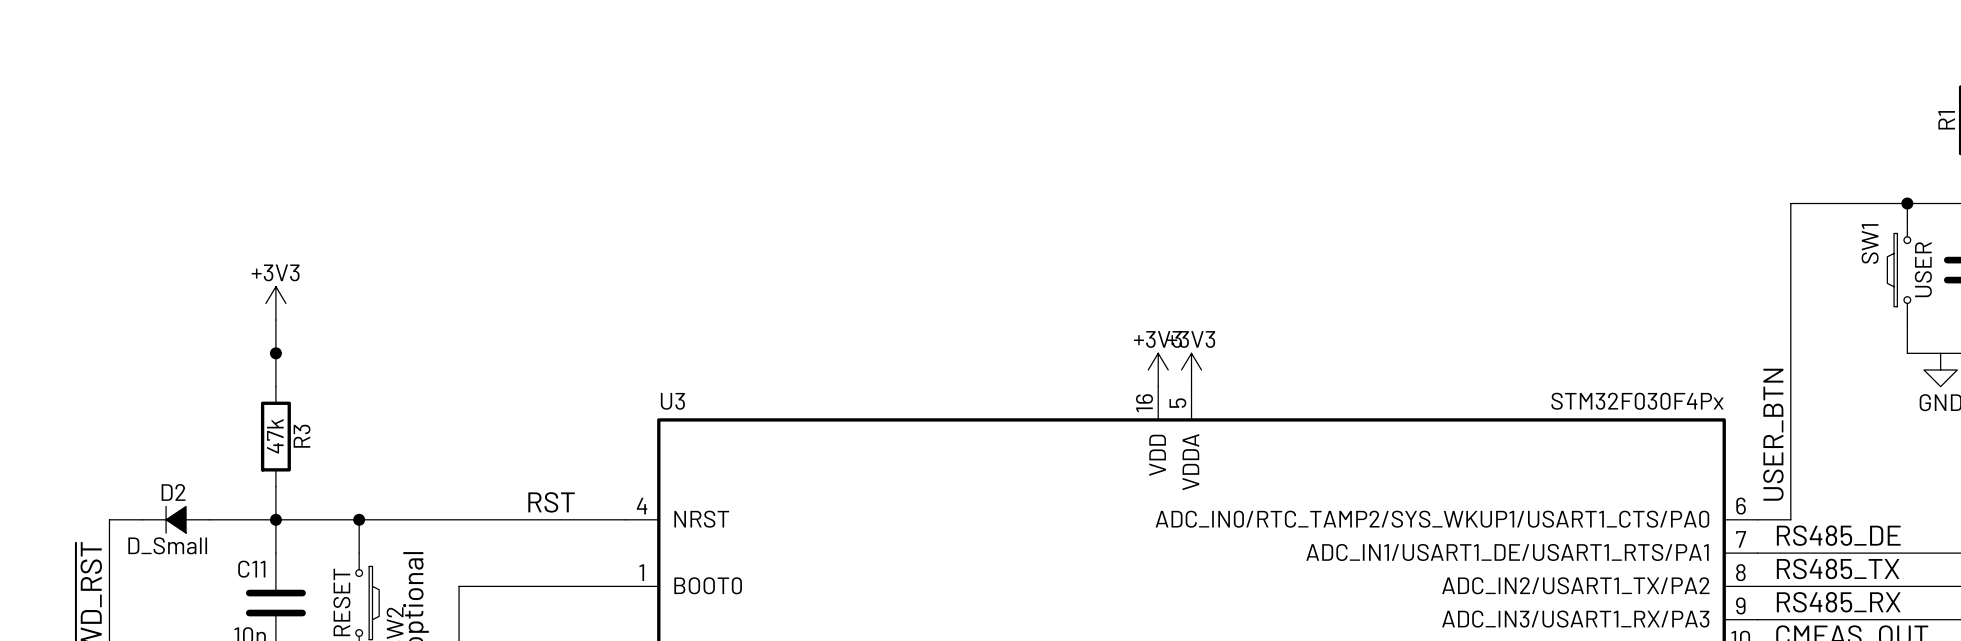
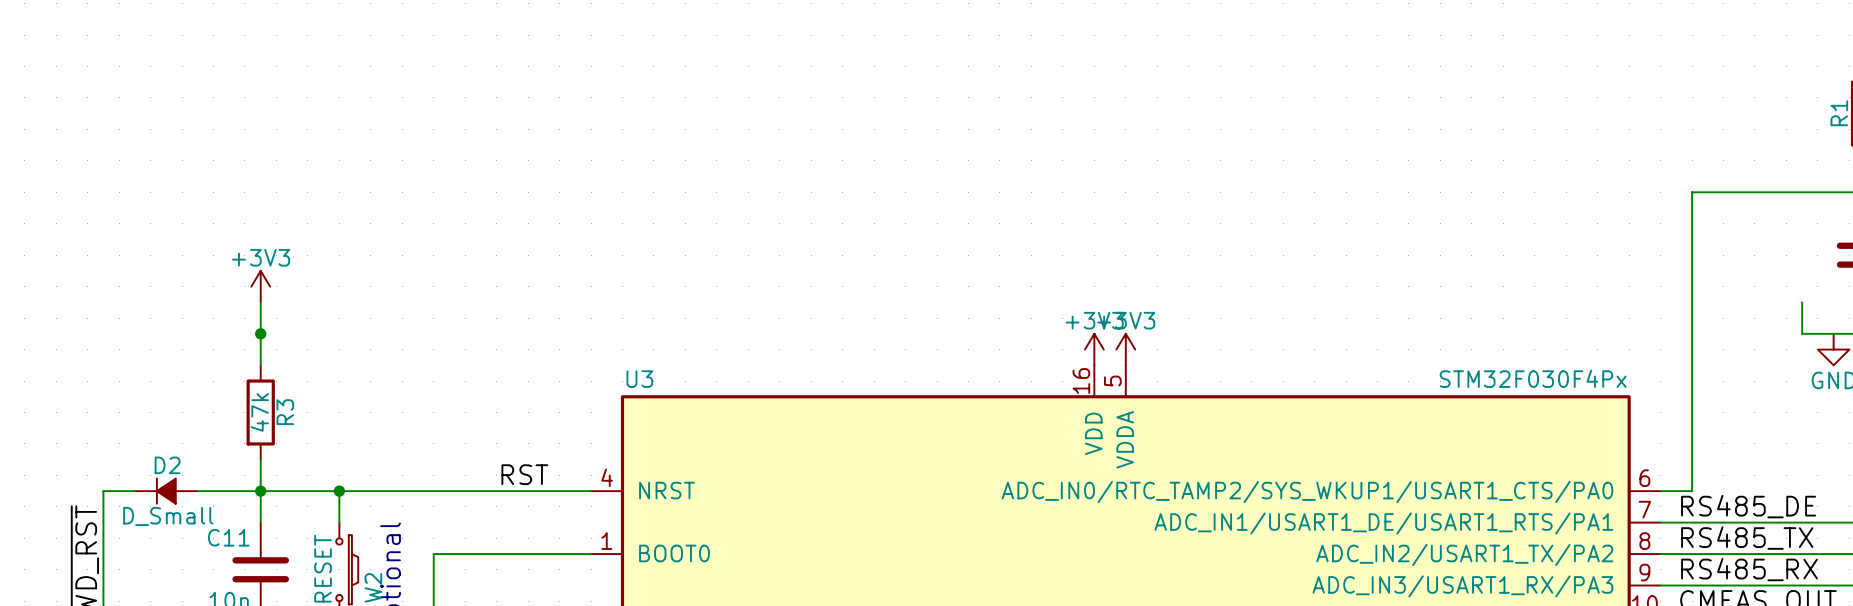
wire: (1907, 203) (1907, 220) -> none
junction: (1907, 203) -> none
SW1: USER (1899, 270) -> none
label: USER_BTN (1773, 434) -> none

